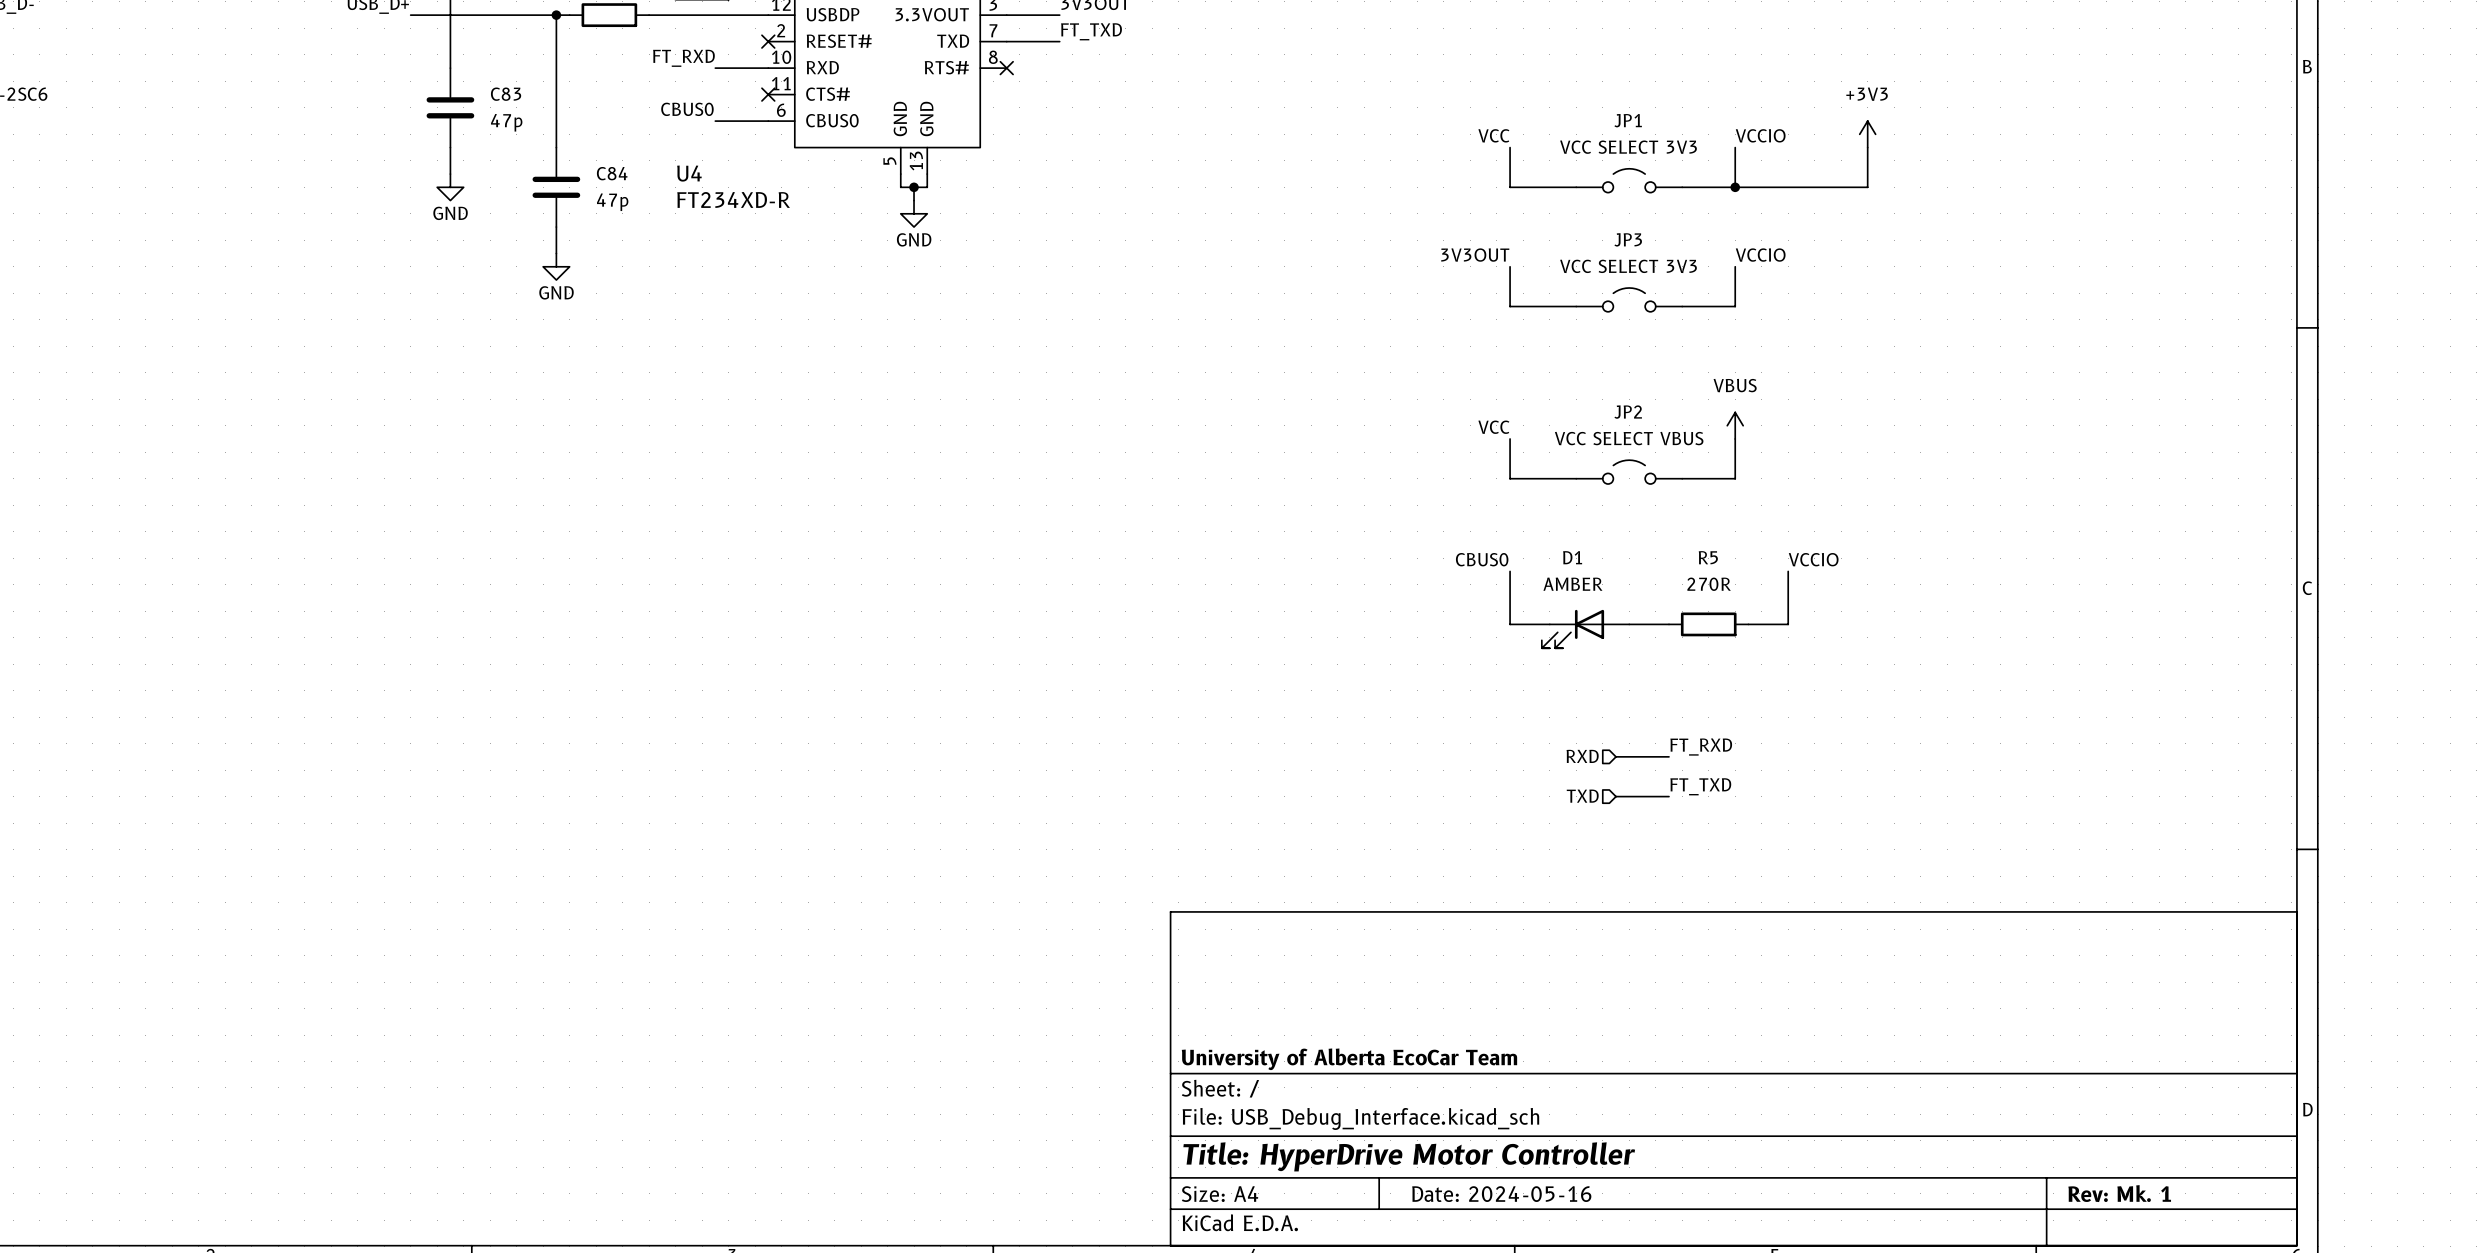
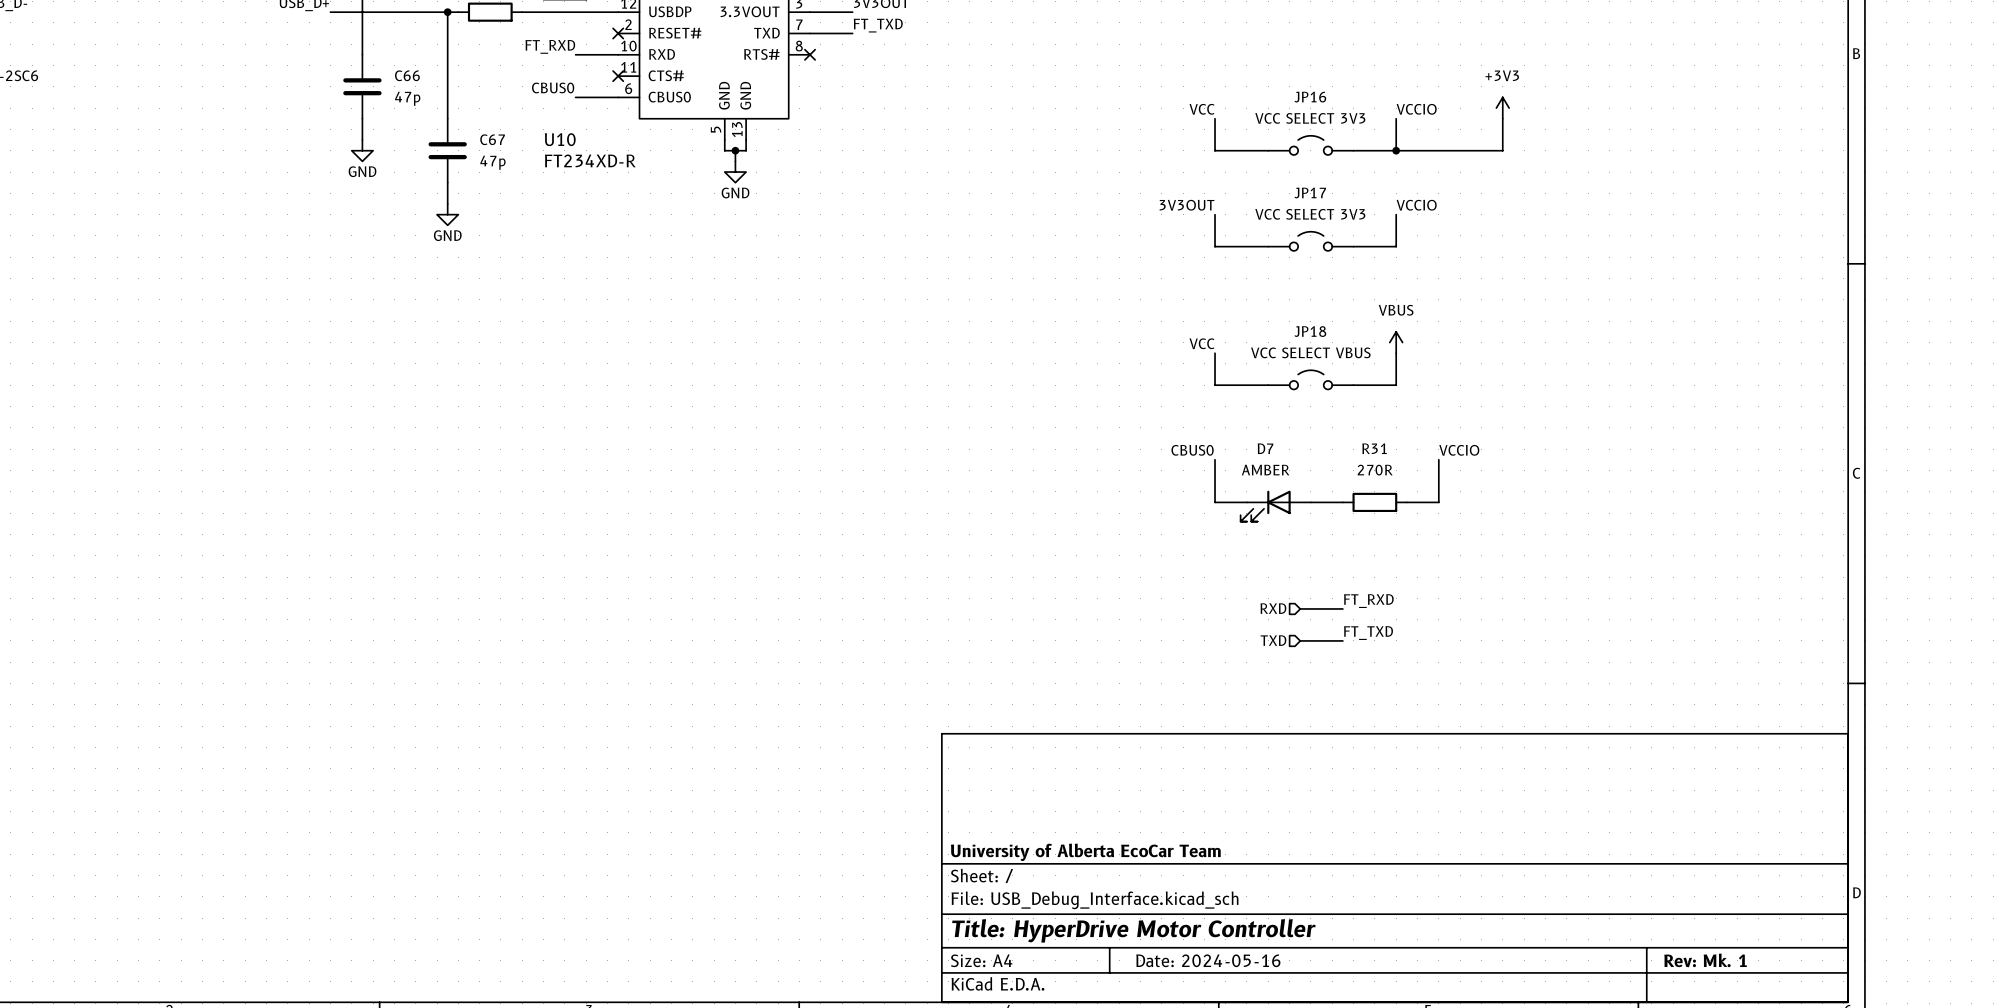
C83 name: C83 (506, 94) -> C66 (407, 75)
JP1 name: JP1 (1628, 120) -> JP16 (1310, 97)
C84 name: C84 (612, 173) -> C67 (492, 139)
U4 name: U4 (689, 173) -> U10 (560, 139)
JP3 name: JP3 (1628, 239) -> JP17 (1310, 193)
JP2 name: JP2 (1628, 412) -> JP18 (1310, 331)
D1 name: D1 (1572, 557) -> D7 (1265, 448)
R5 name: R5 (1708, 557) -> R31 (1374, 448)

